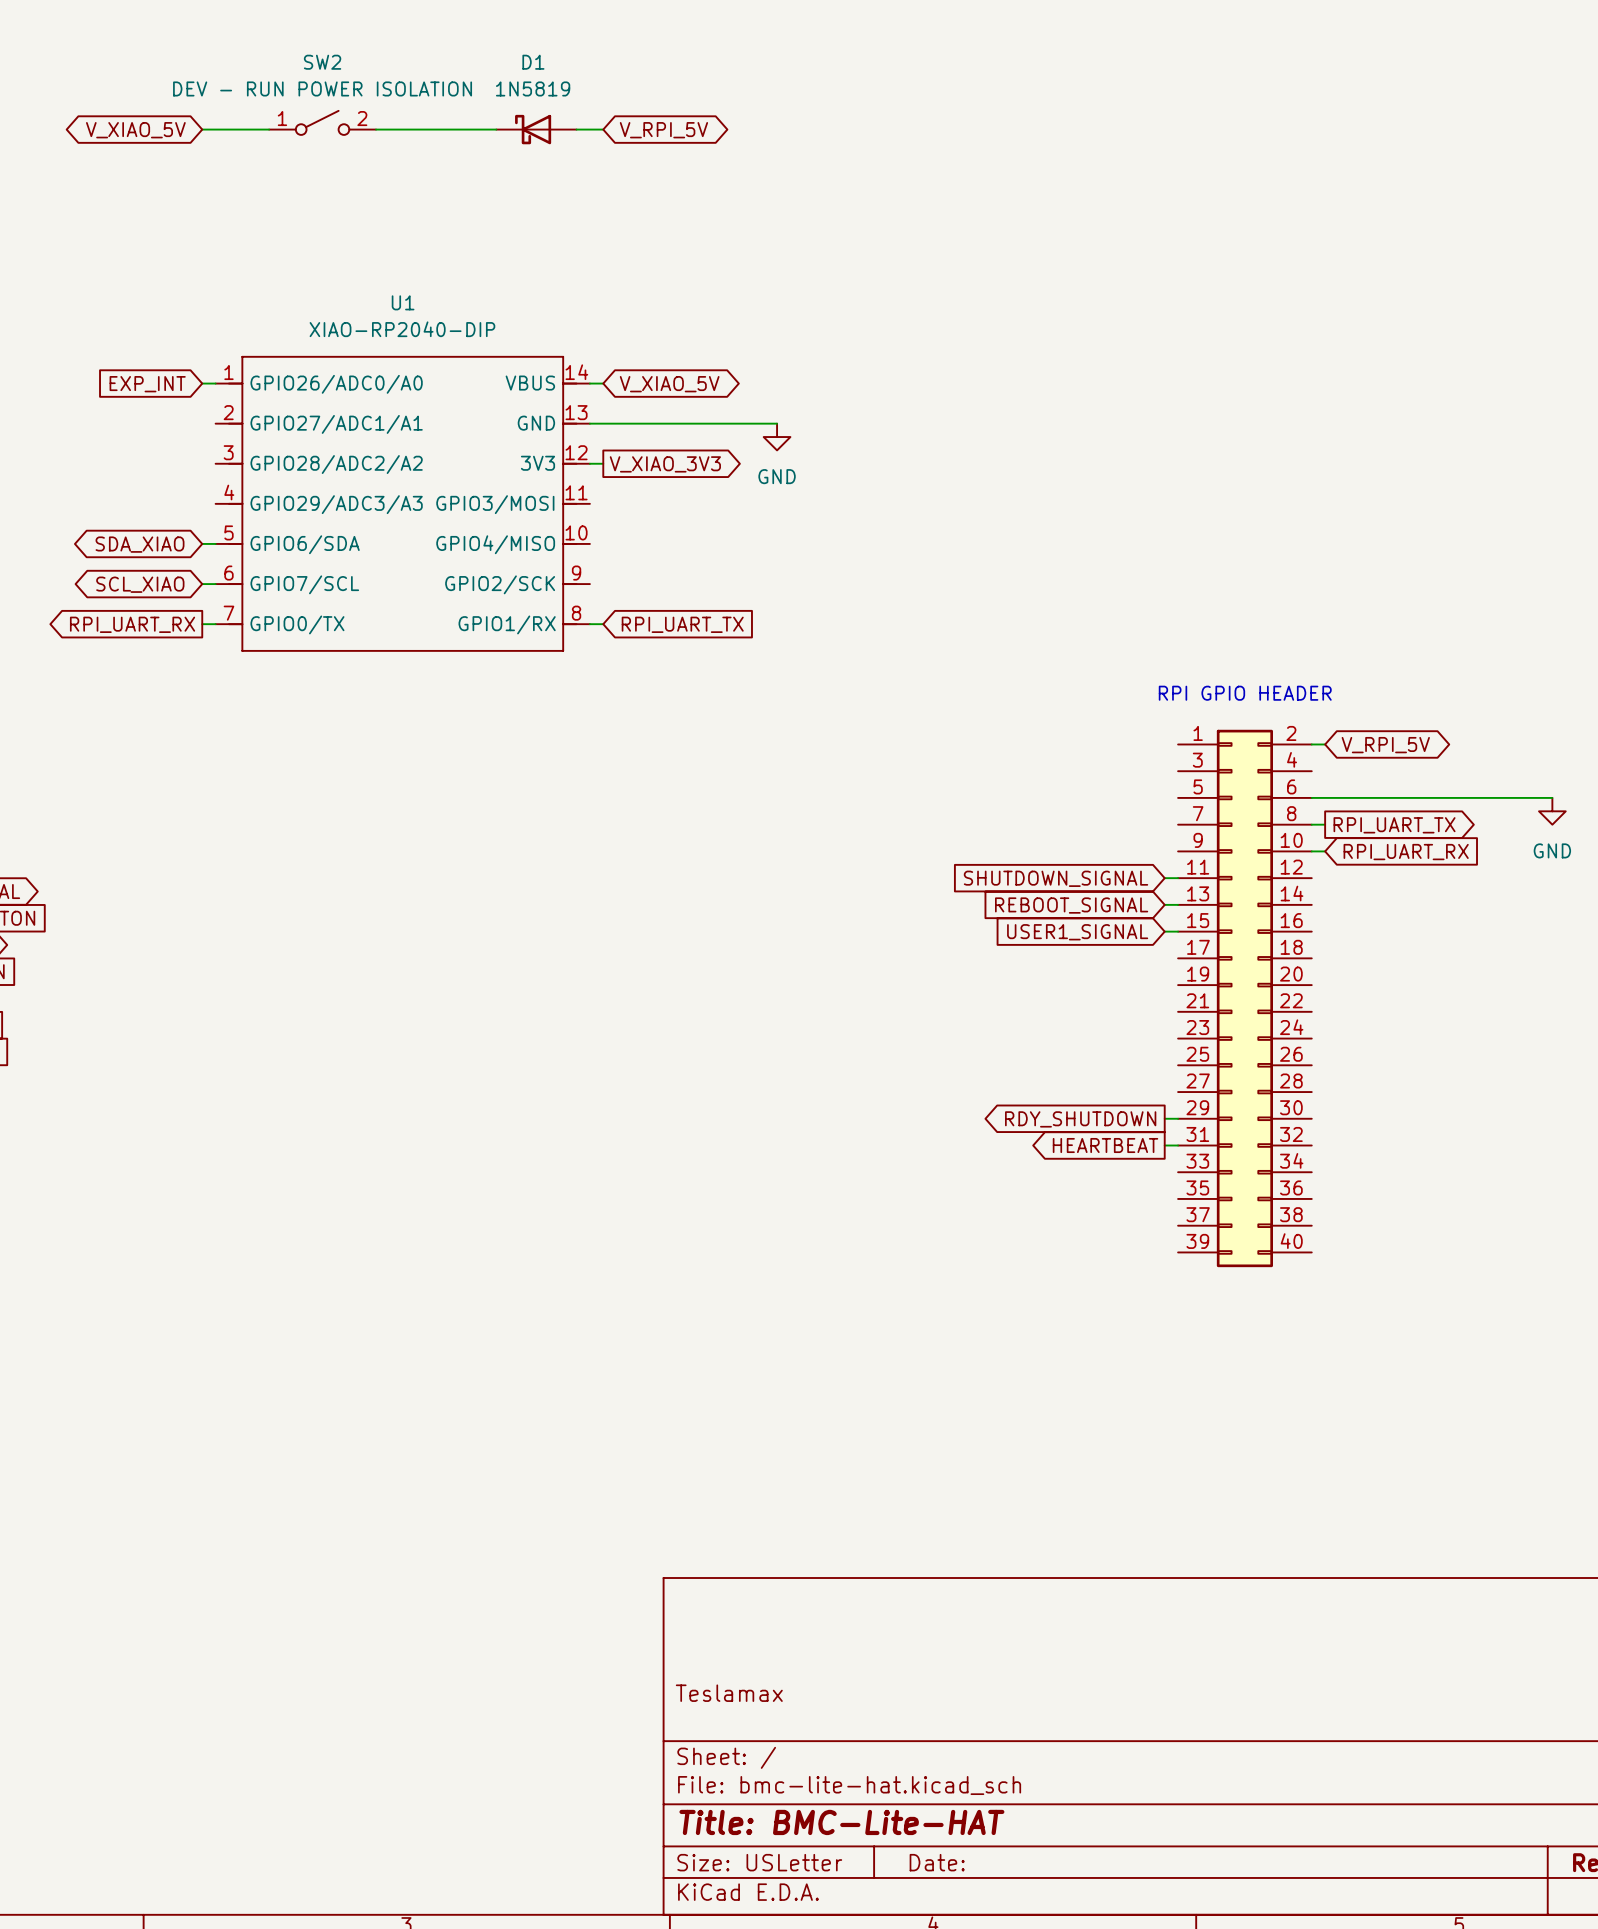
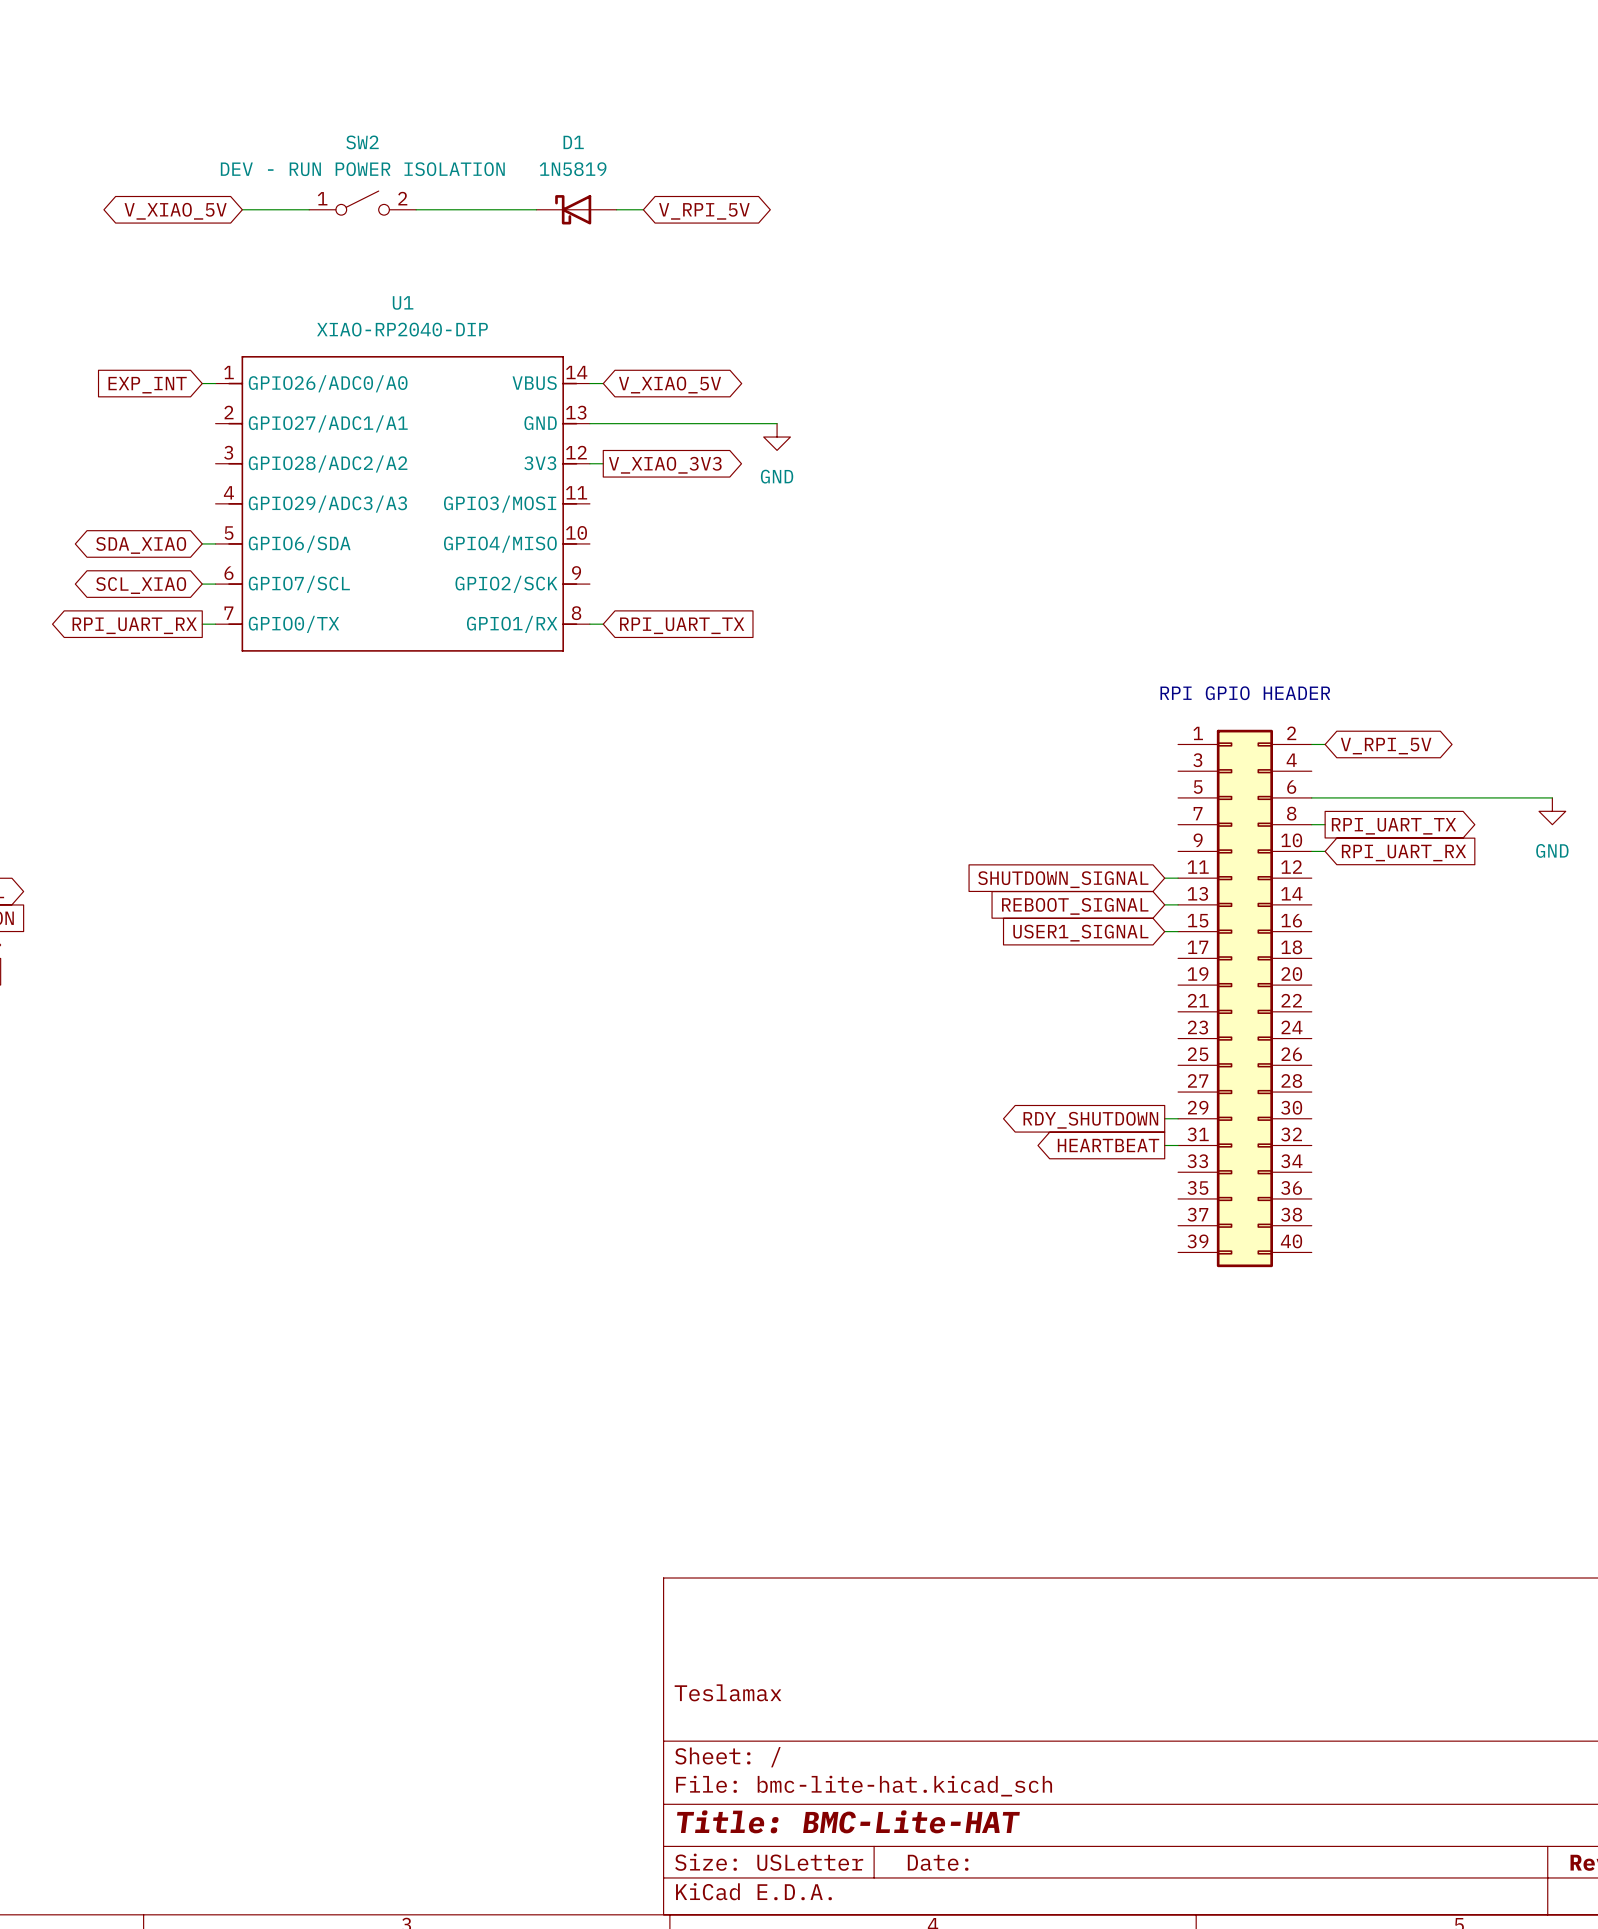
SW2 position: (322, 122) -> (362, 203)
wire: (202, 129) (269, 129) -> (242, 209) (309, 209)
wire: (376, 129) (496, 129) -> (416, 209) (536, 209)
D1 position: (536, 129) -> (576, 209)
wire: (576, 129) (603, 129) -> (616, 209) (643, 209)
global label position: V_XIAO_5V (135, 130) -> V_XIAO_5V (175, 211)
global label position: V_RPI_5V (663, 130) -> V_RPI_5V (704, 211)

